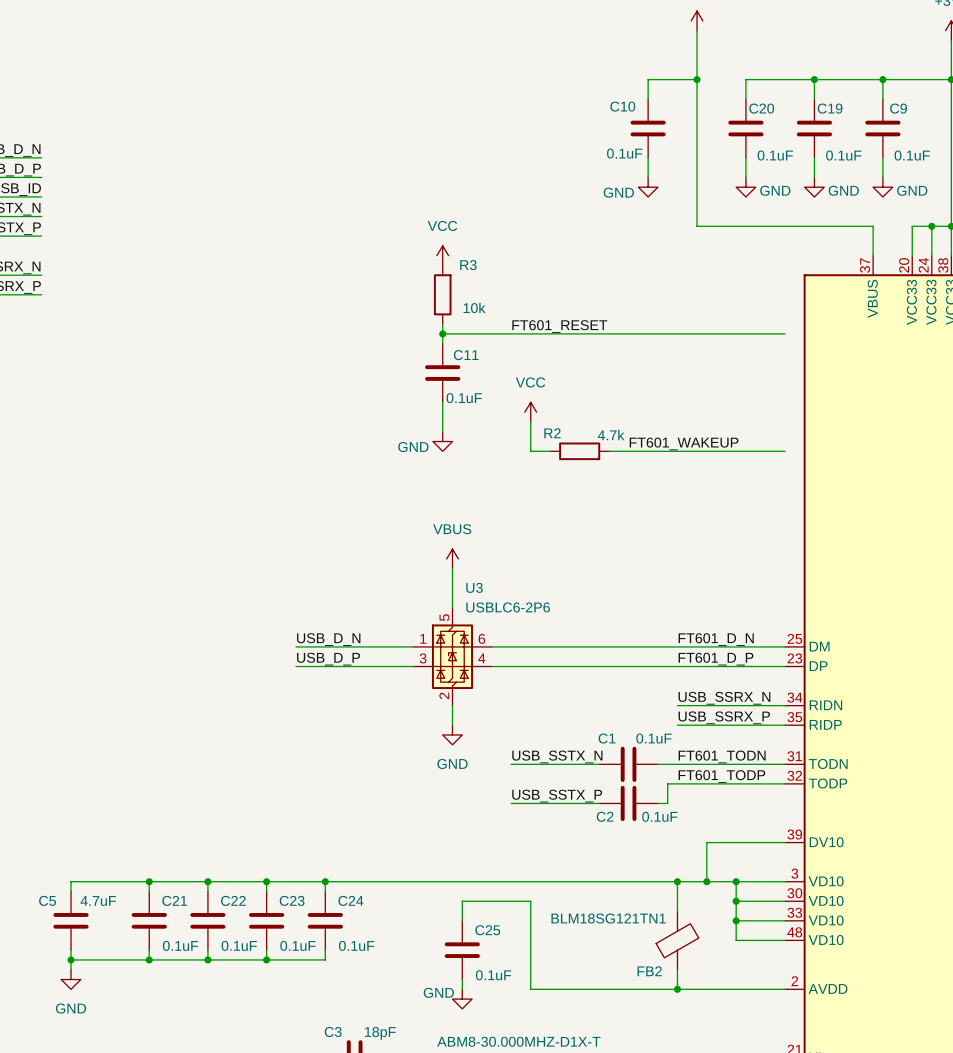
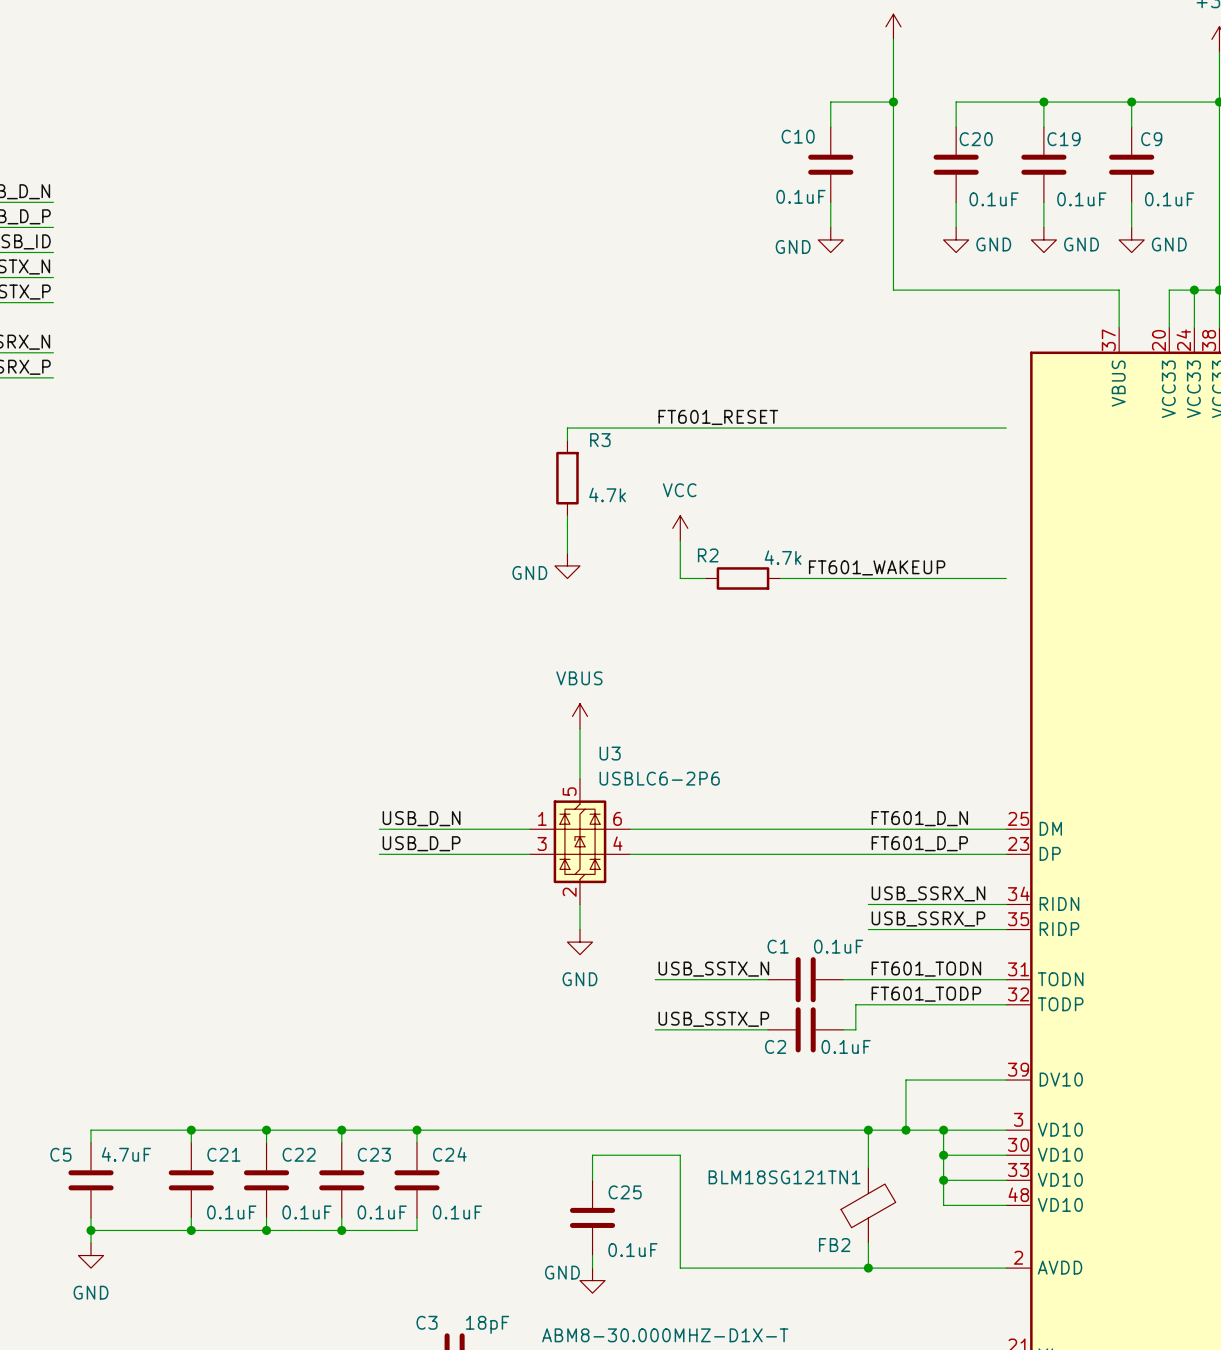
power symbol: VCC (442, 255) -> none
R3 position: (442, 294) -> (567, 478)
R3 value: 10k (474, 307) -> 4.7k (607, 494)
wire: (442, 324) (442, 333) -> none
junction: (442, 333) -> none
C11: 0.1uF (442, 373) -> none

